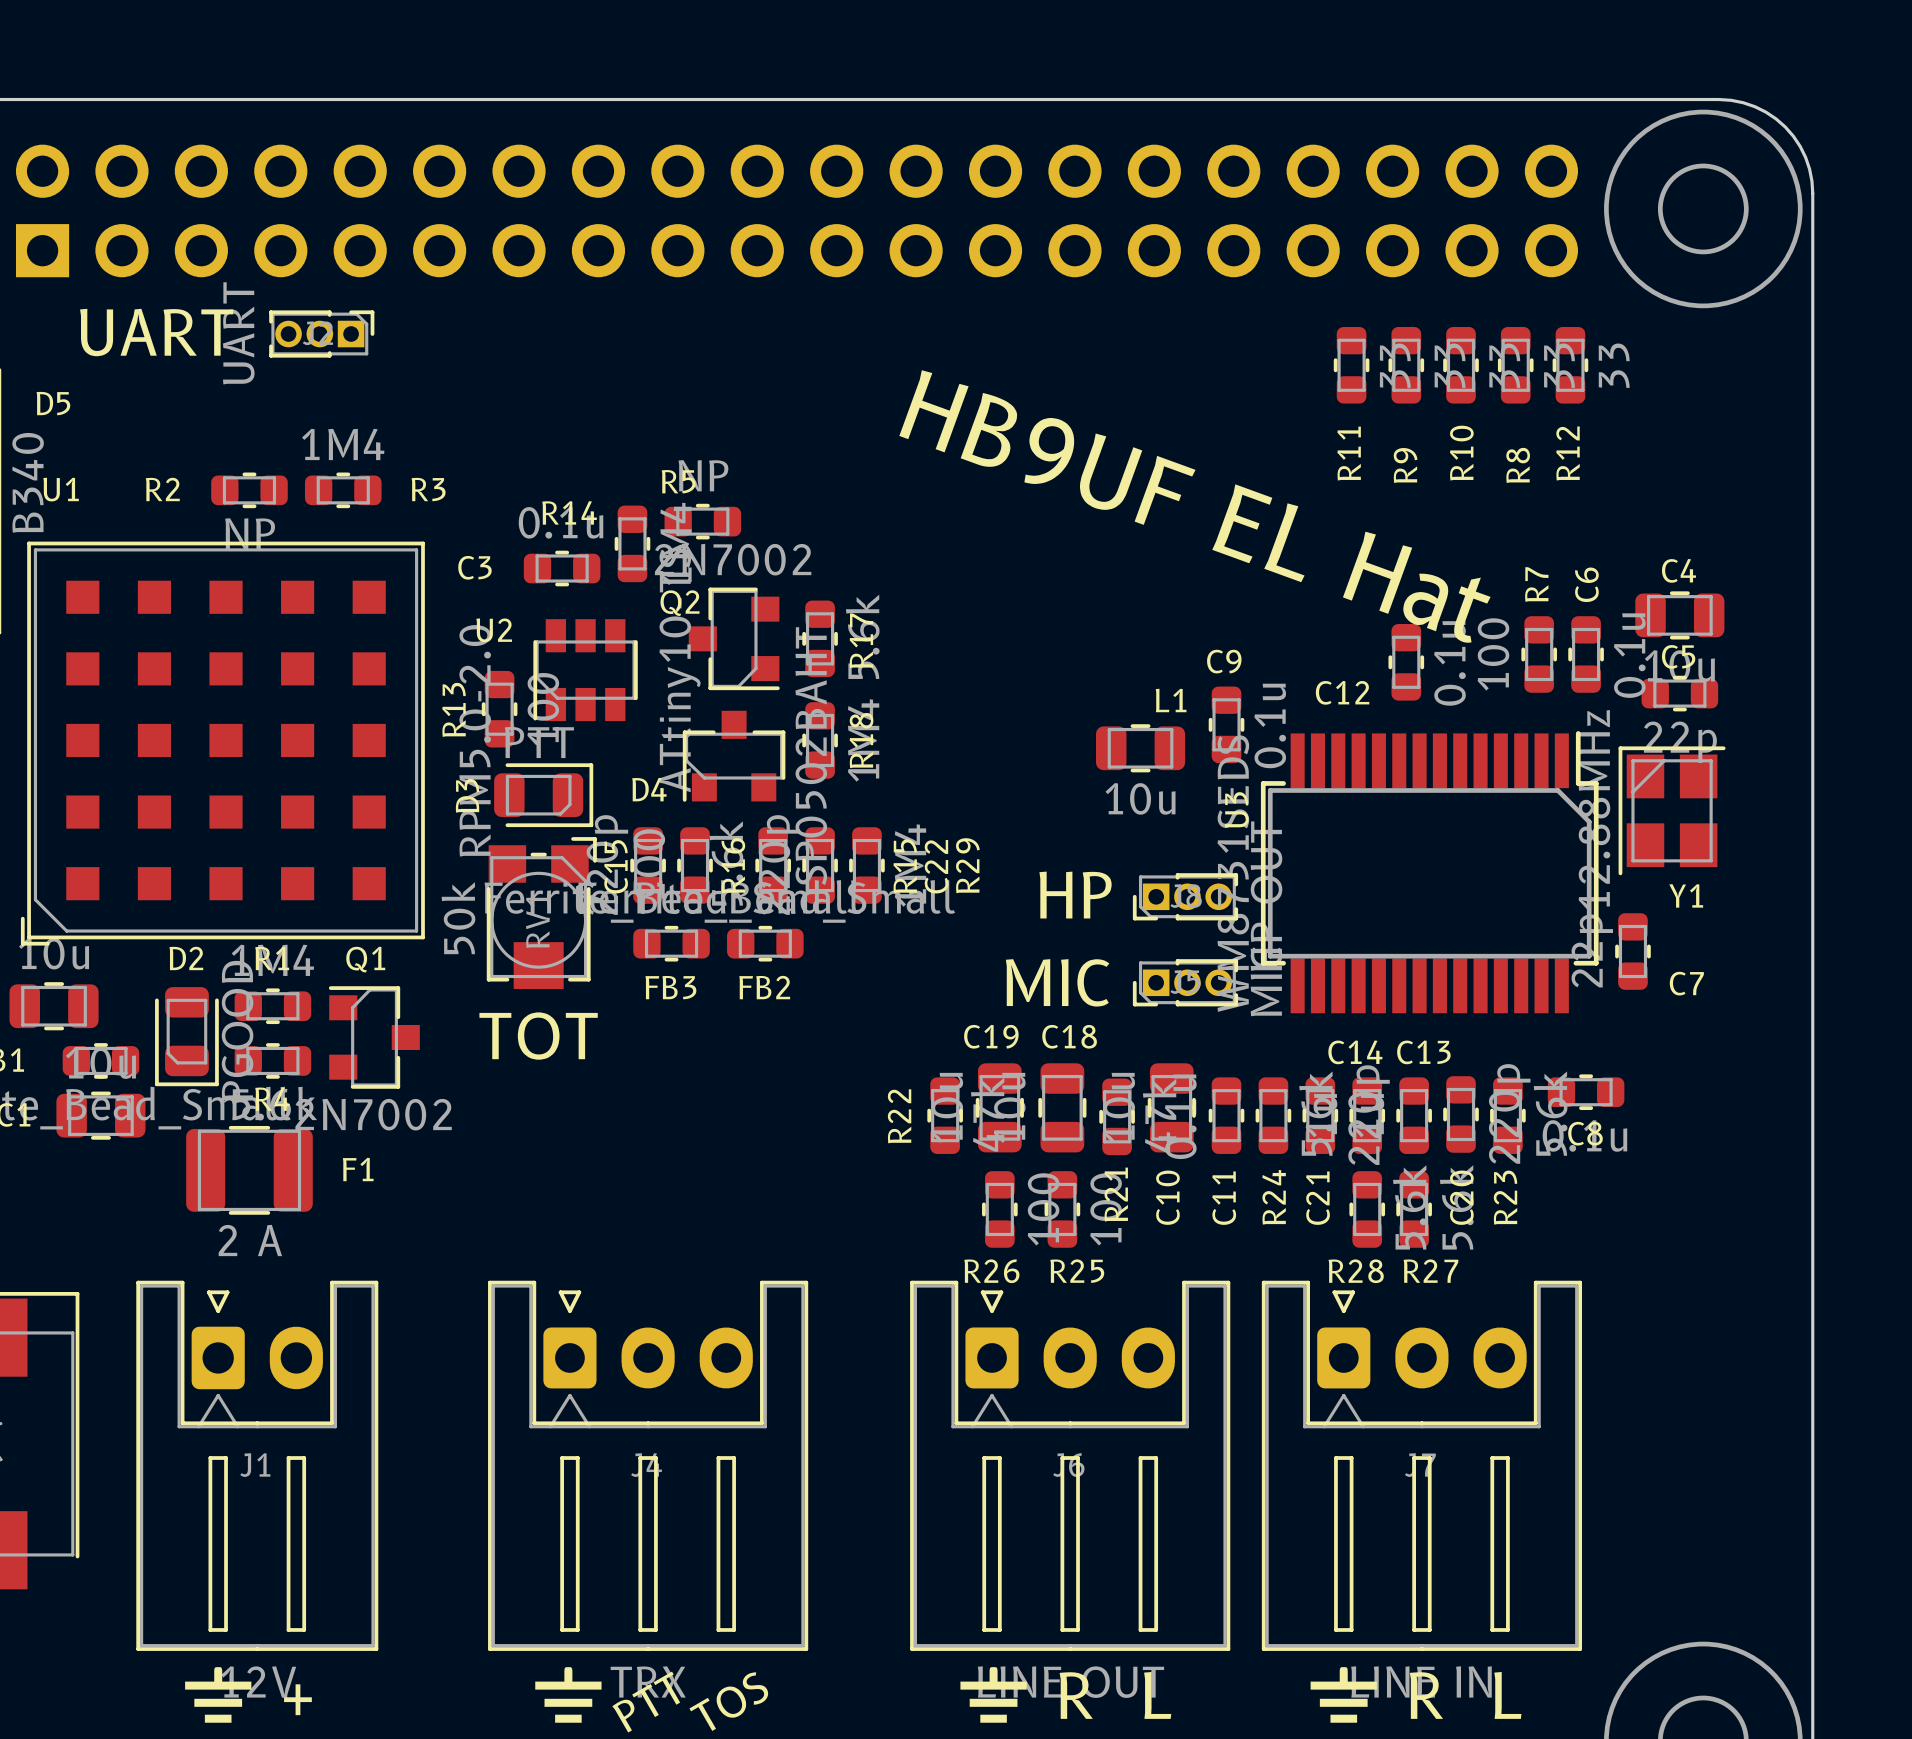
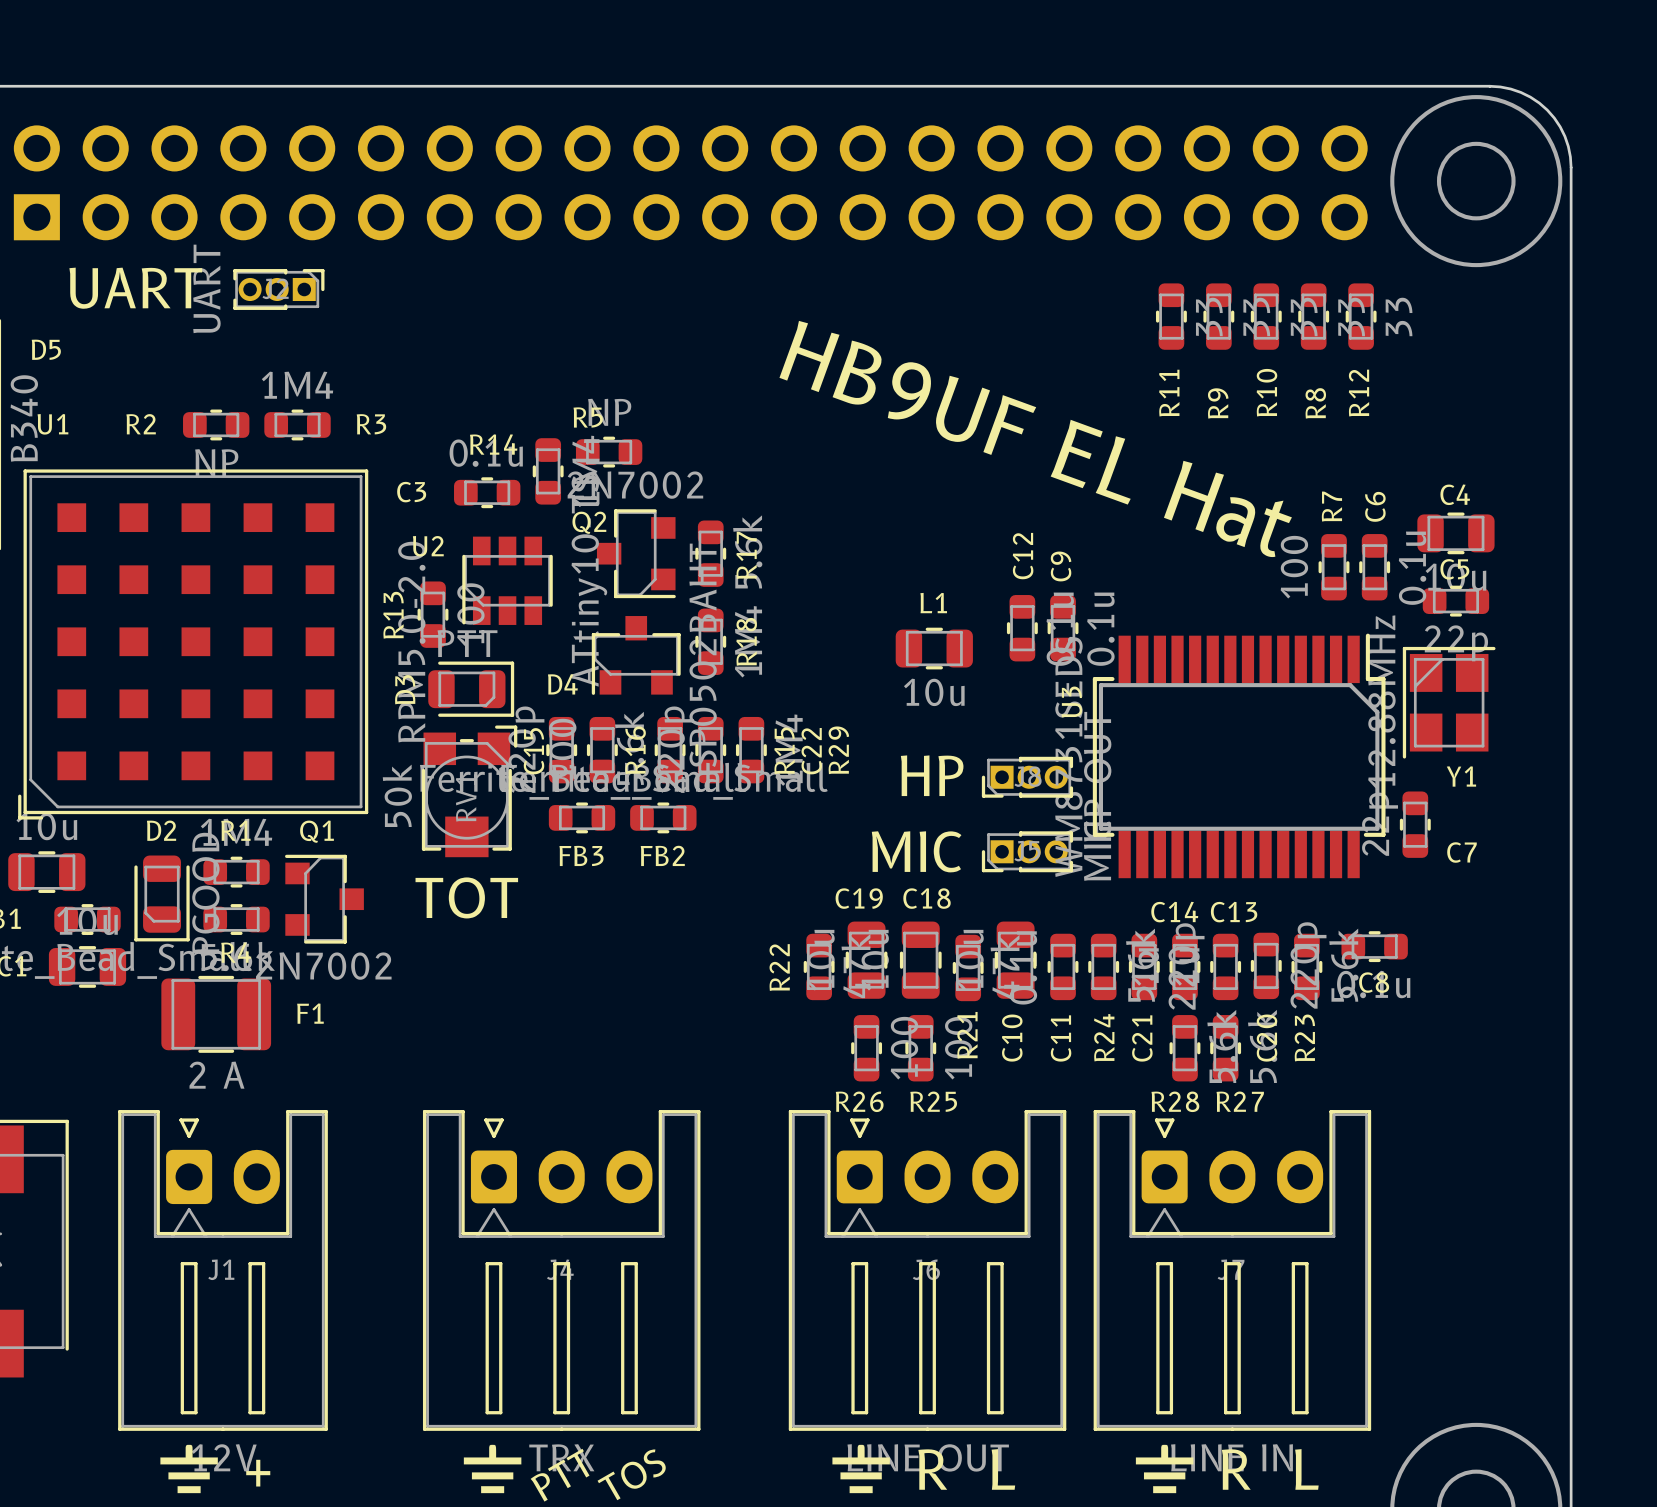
C9 name rotation: 0° (1224, 661) -> 90° counterclockwise (1061, 566)
C12 position: (1406, 662) -> (1022, 628)
C12 name rotation: 0° (1342, 692) -> 90° counterclockwise (1023, 556)
C12 name position: C12 (1342, 692) -> C12 (1023, 556)
L1 name position: L1 (1171, 700) -> L1 (933, 603)
L1 position: (1140, 748) -> (934, 648)

